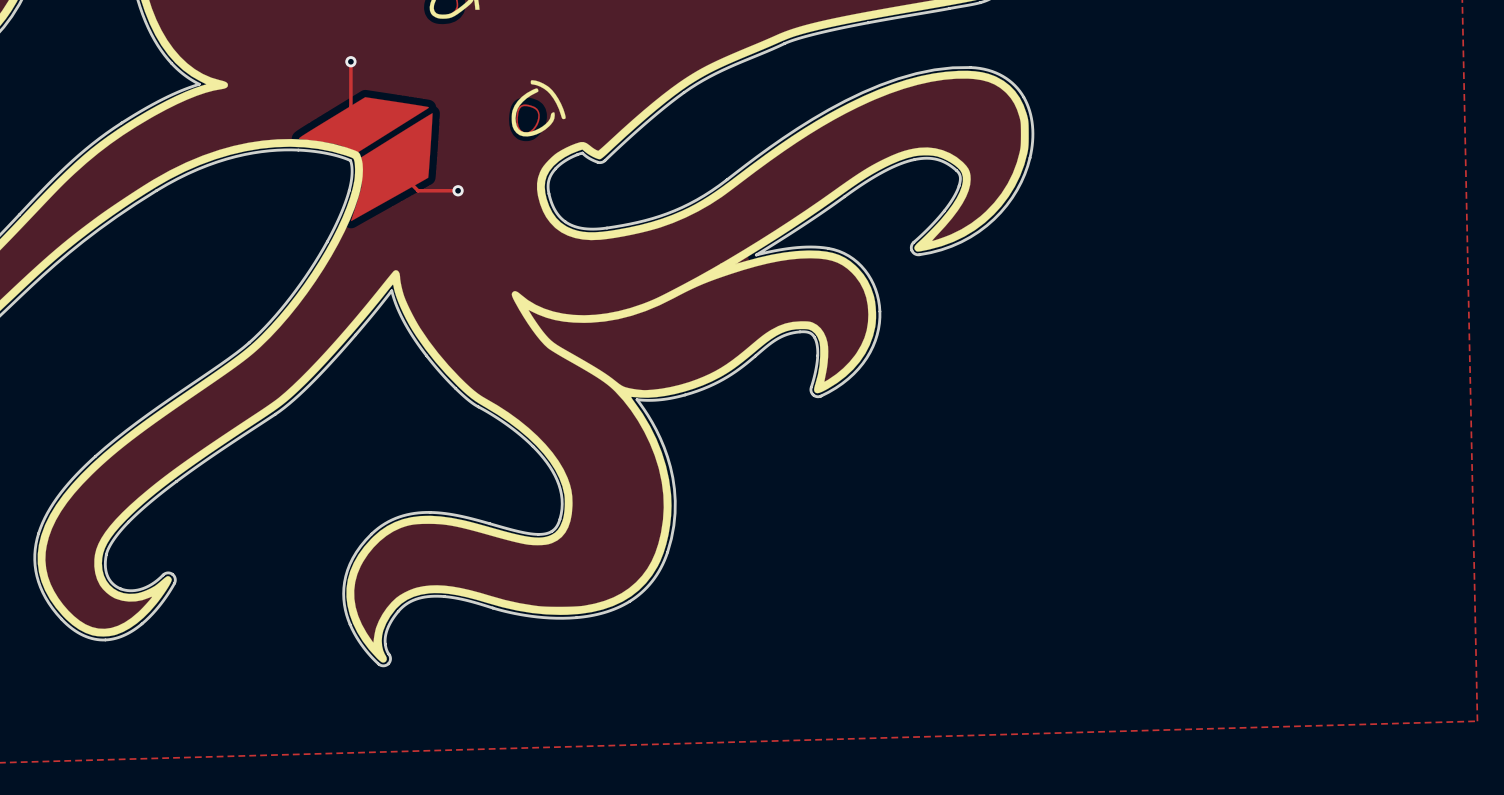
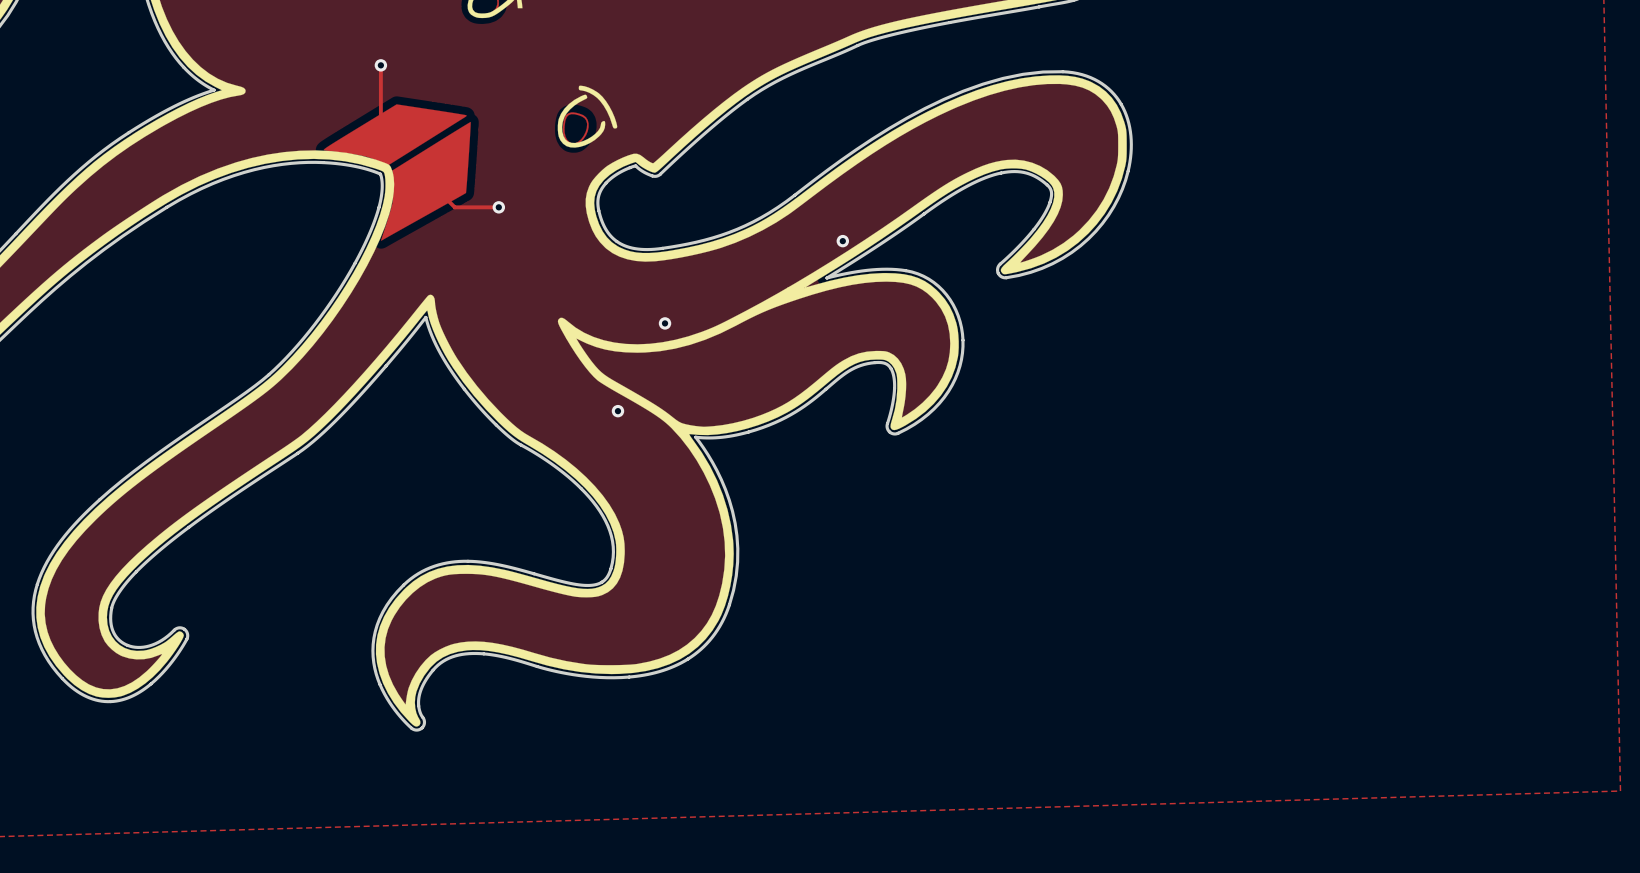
via: none -> (842, 241)
via: none -> (665, 323)
via: none -> (617, 411)

